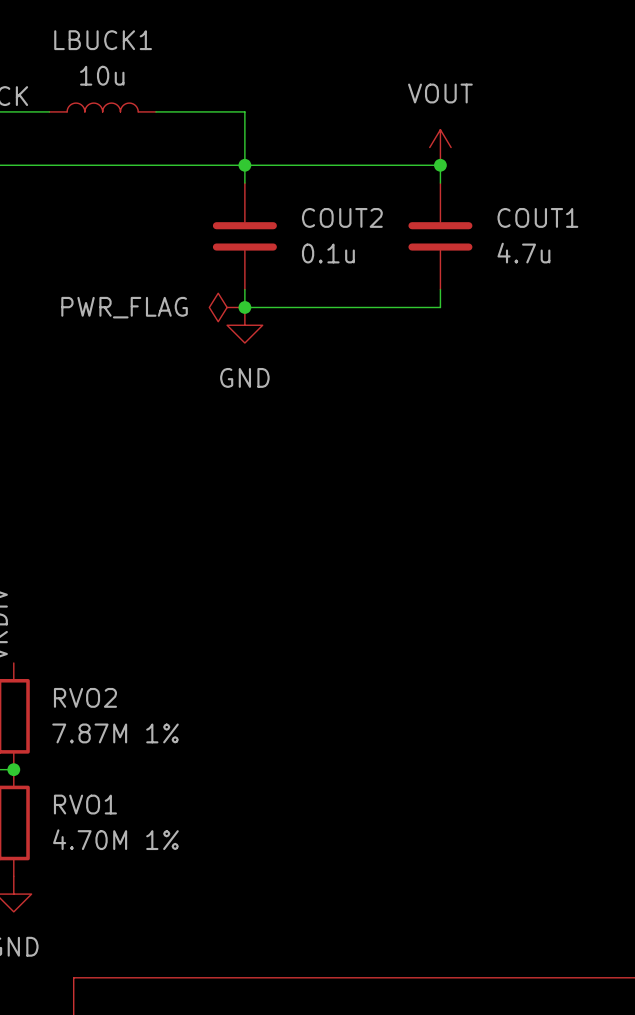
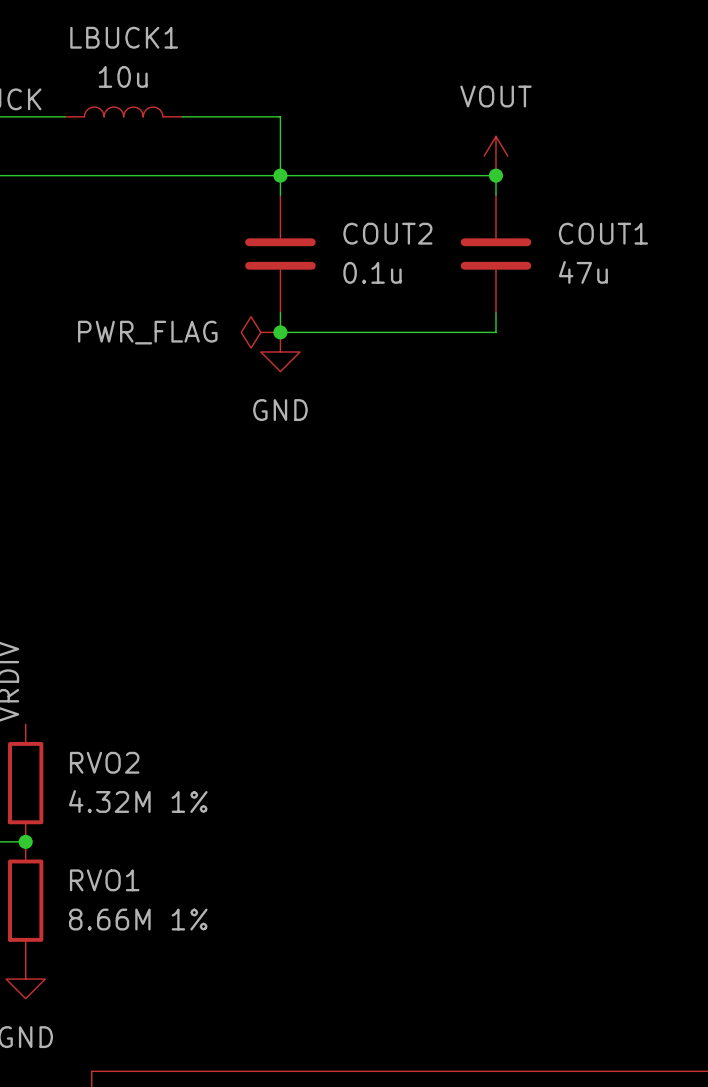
COUT1 value: 4.7u (523, 253) -> 47u (583, 272)
RVO2 value: 7.87M 1% (115, 733) -> 4.32M 1% (138, 801)
RVO1 value: 4.70M 1% (115, 839) -> 8.66M 1% (138, 919)

